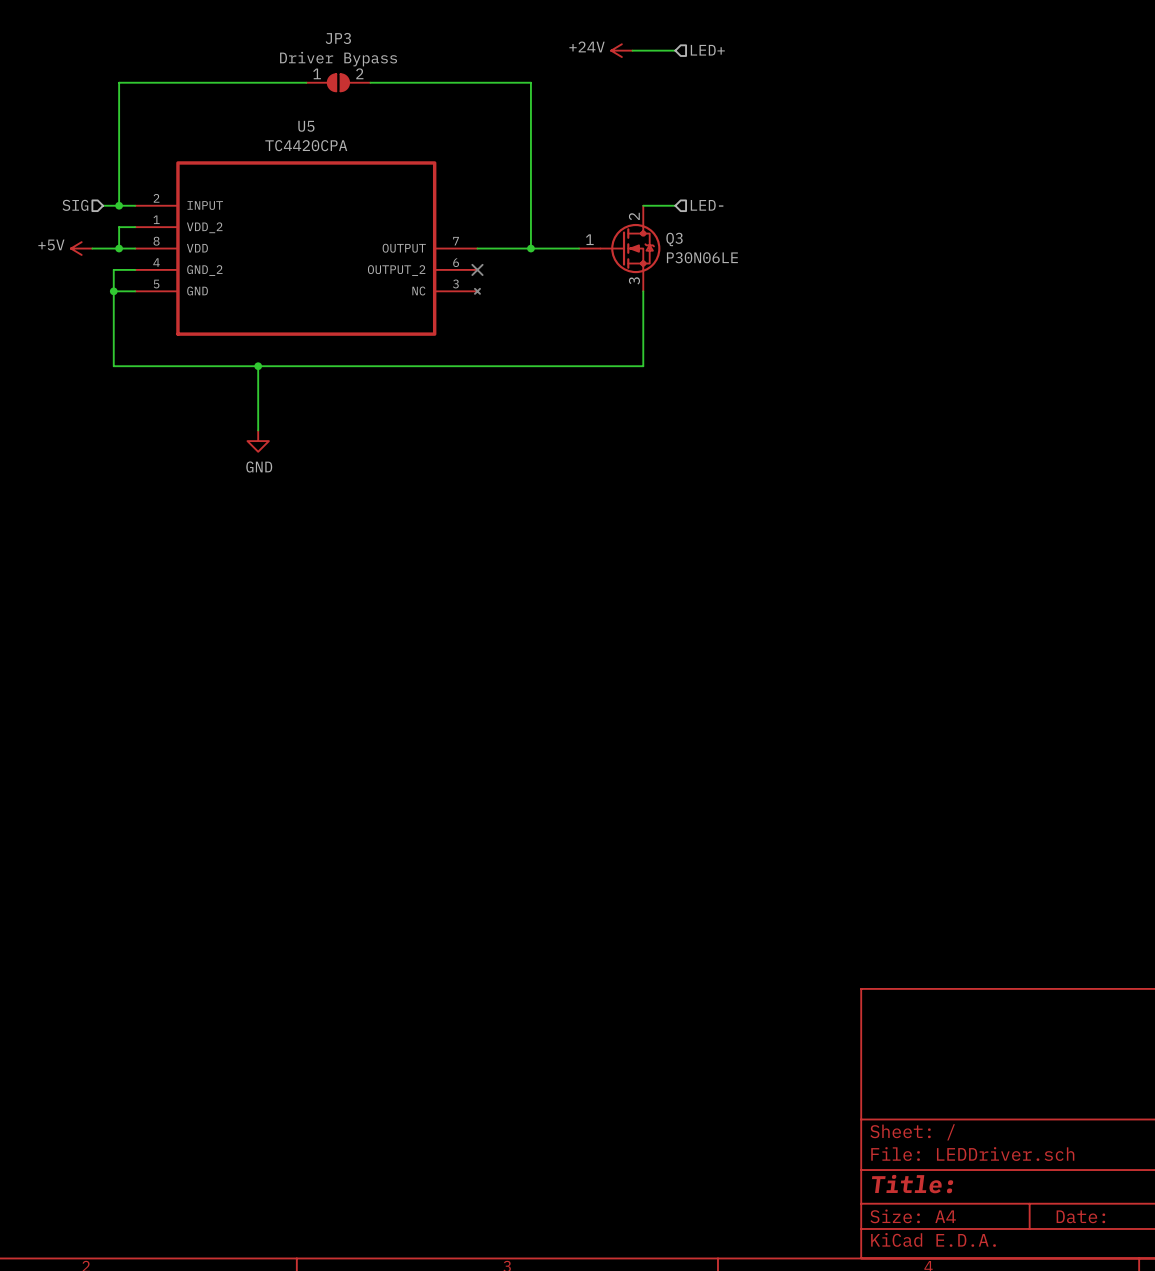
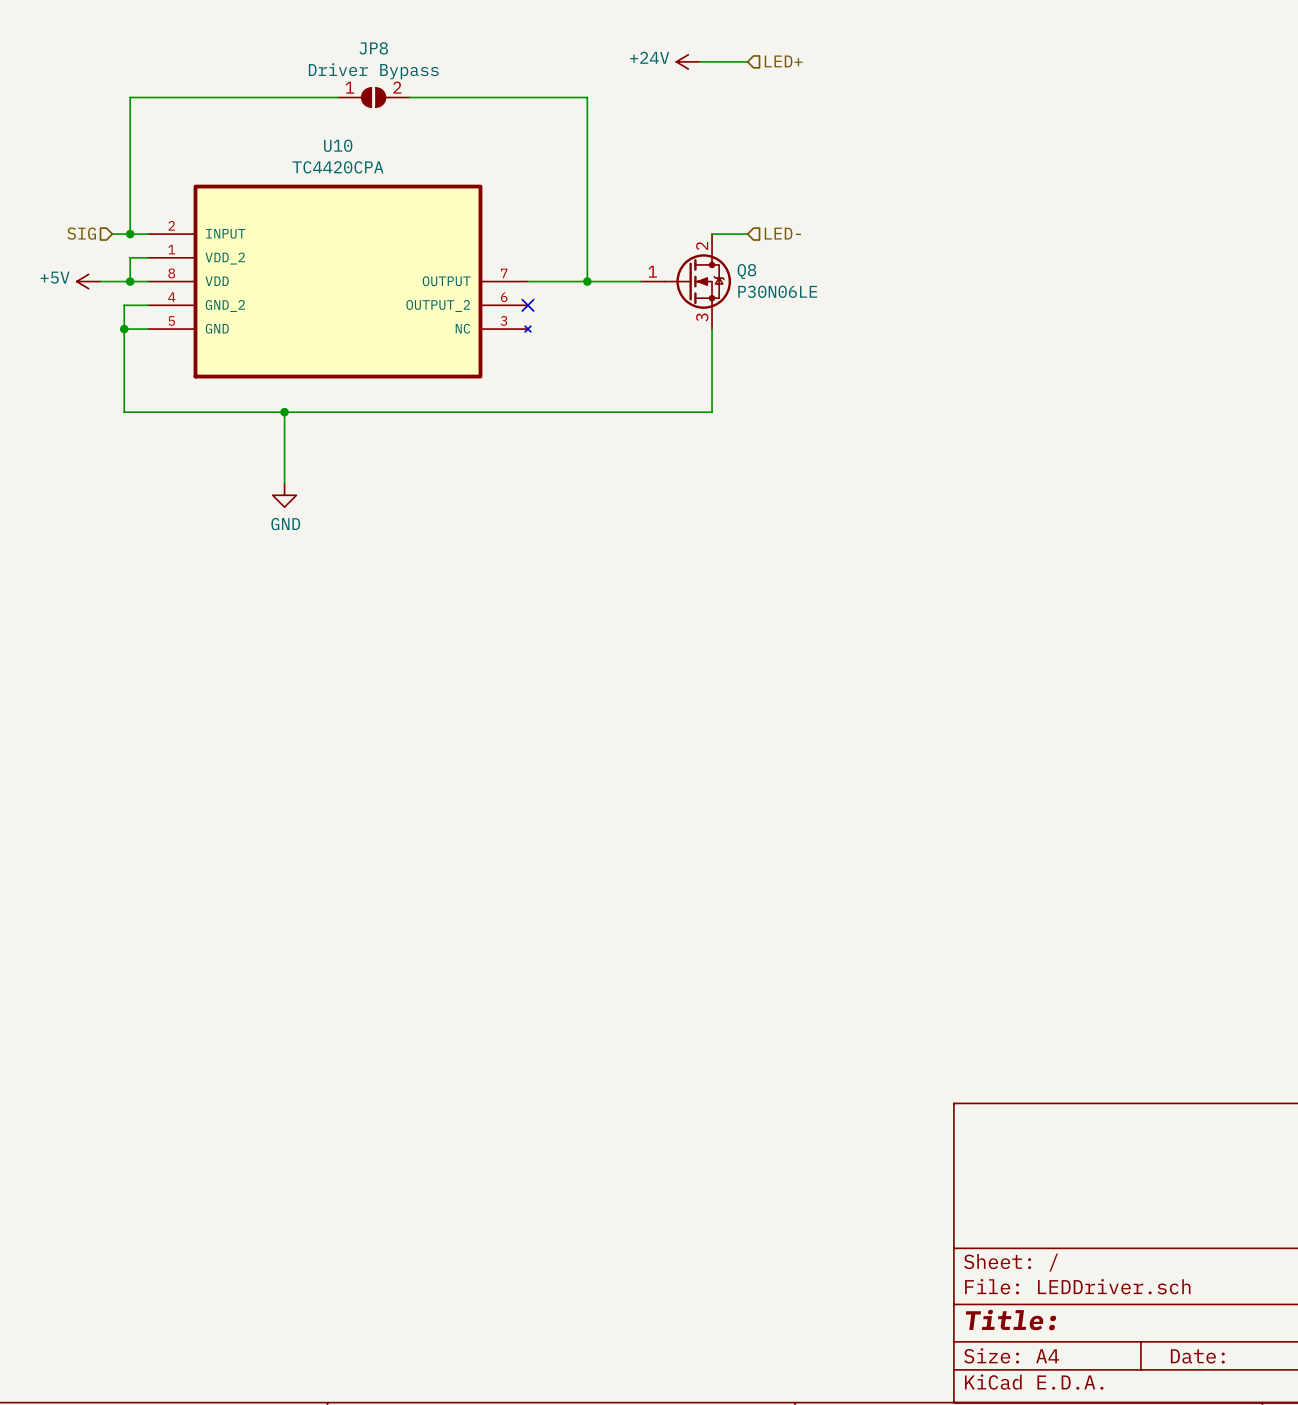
JP3 name: JP3 (338, 38) -> JP8 (373, 48)
U5 name: U5 (306, 126) -> U10 (338, 145)
Q3 name: Q3 (674, 239) -> Q8 (746, 271)

